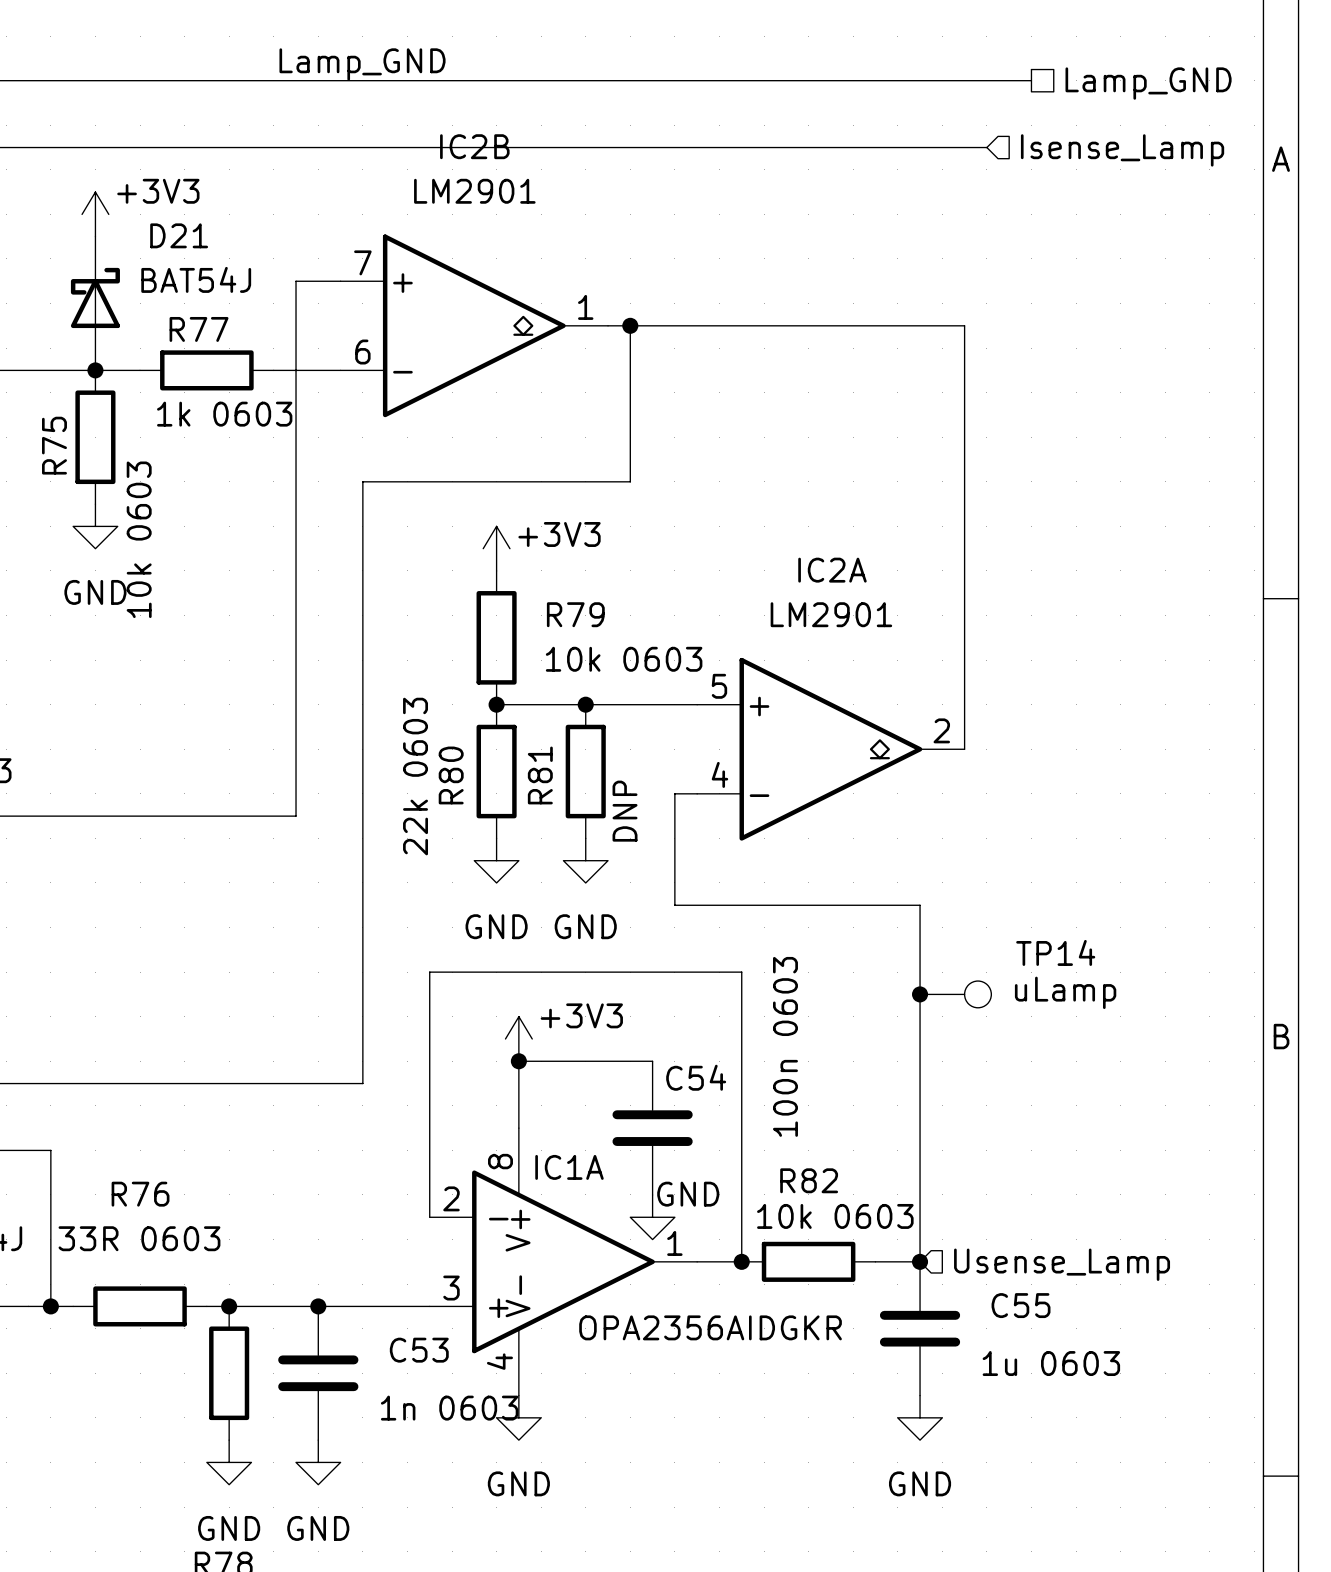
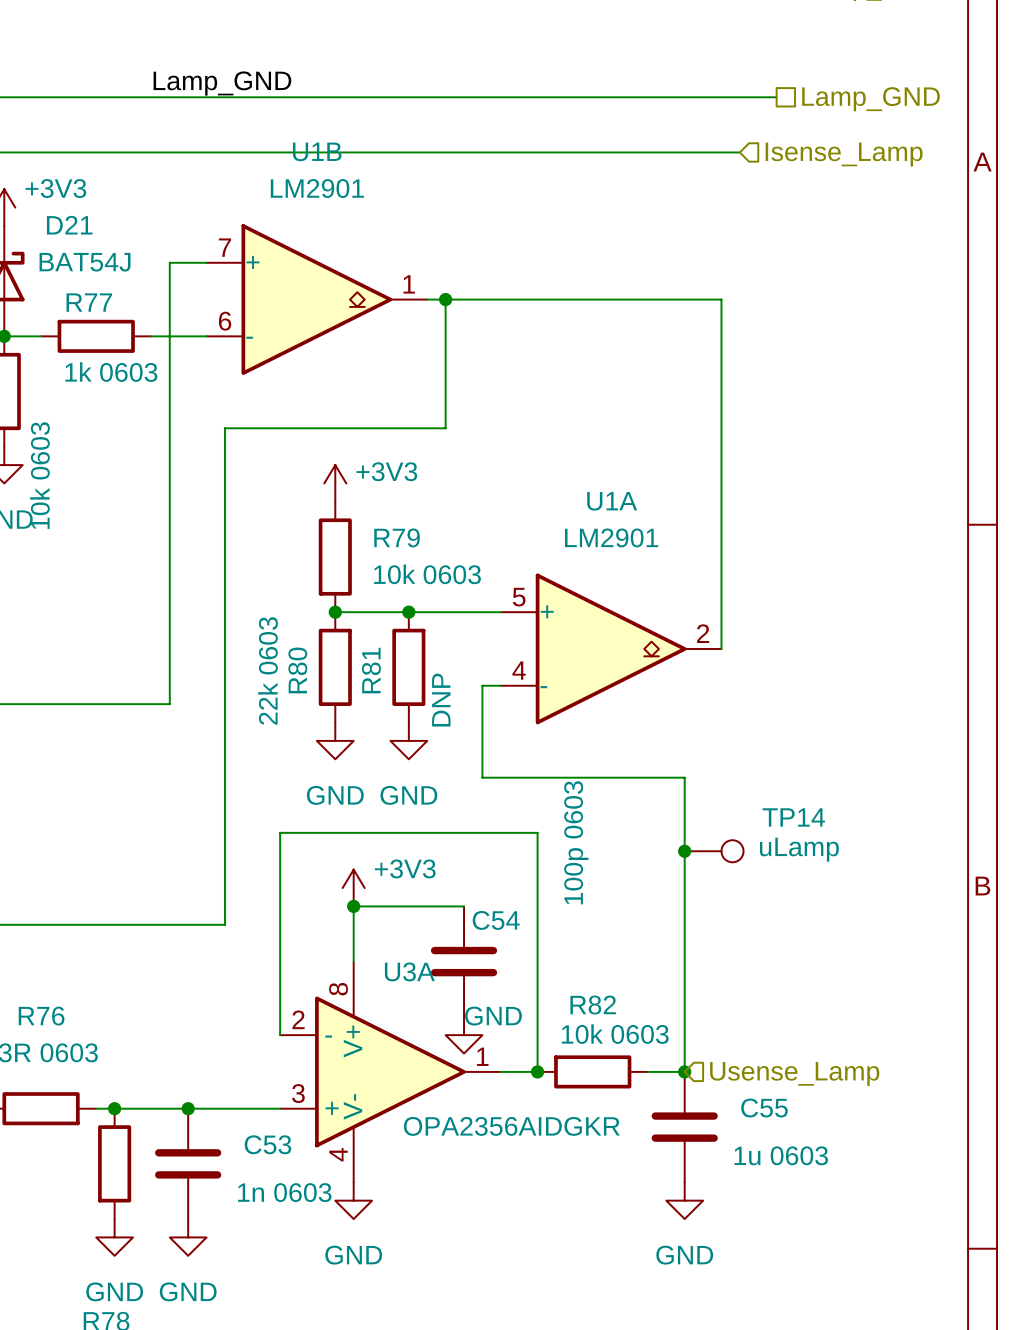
IC2B name: IC2B (474, 146) -> U1B (317, 151)
IC2A name: IC2A (832, 570) -> U1A (612, 501)
C54 value: 100n 0603 (785, 1046) -> 100p 0603 (576, 842)
IC1A name: IC1A (569, 1167) -> U3A (409, 971)

